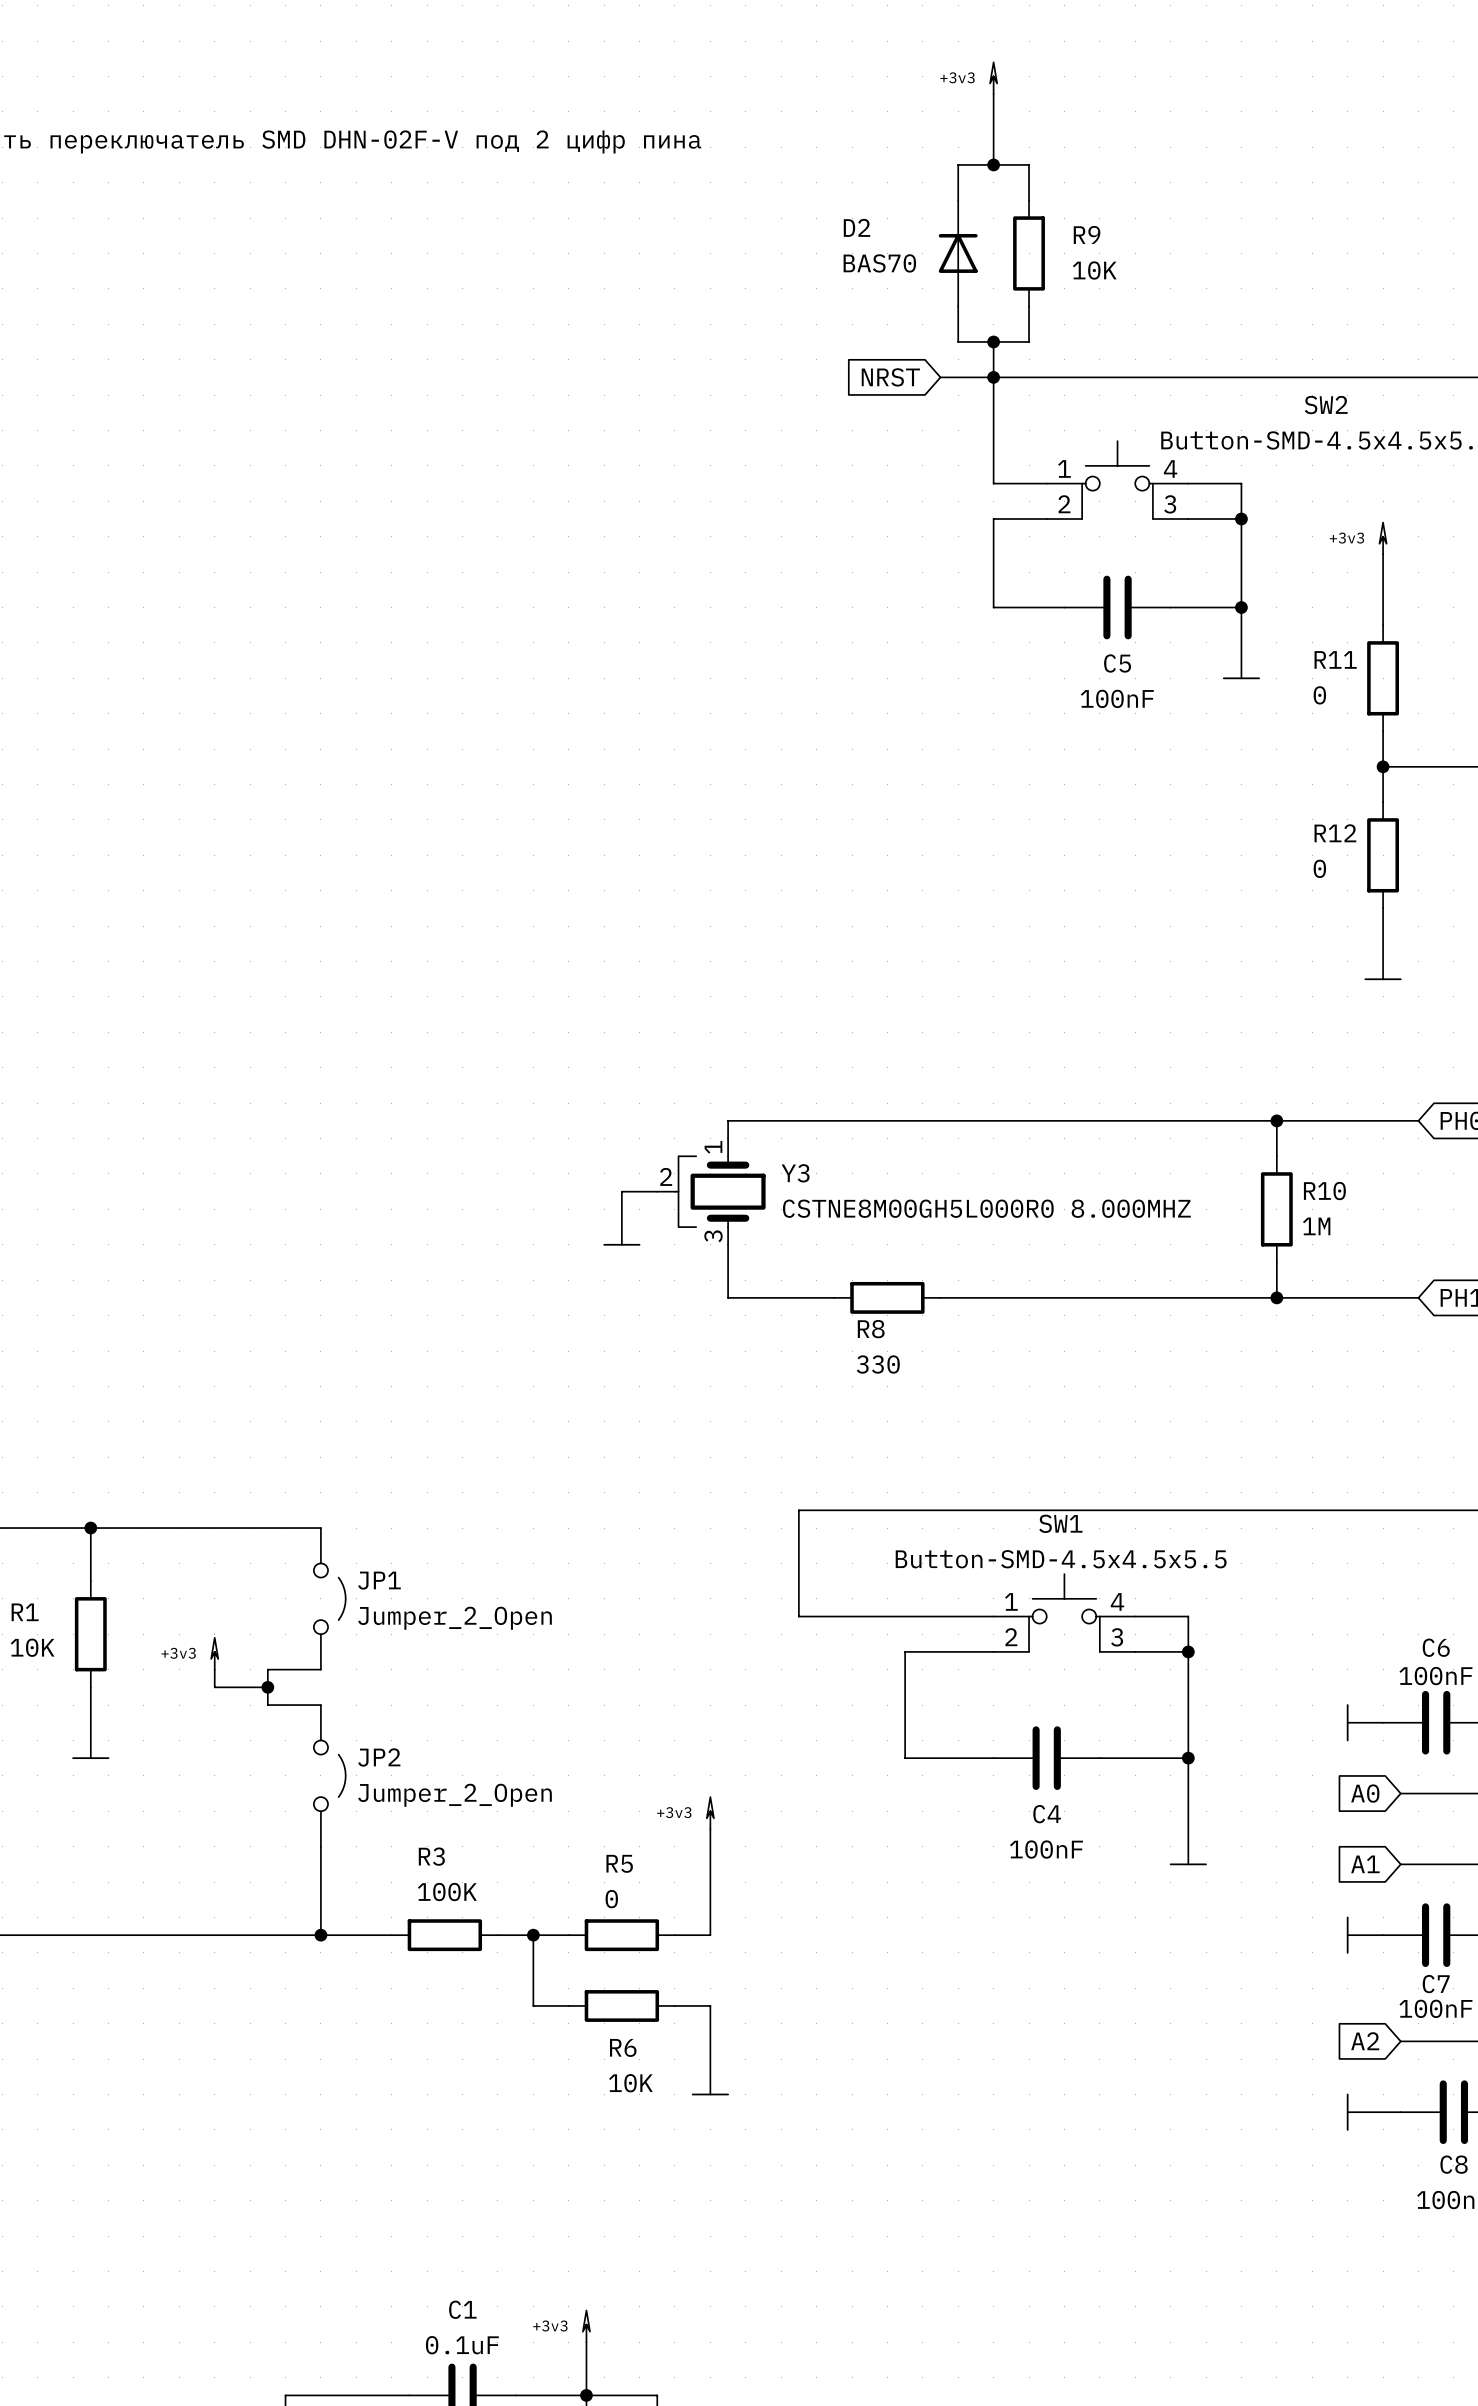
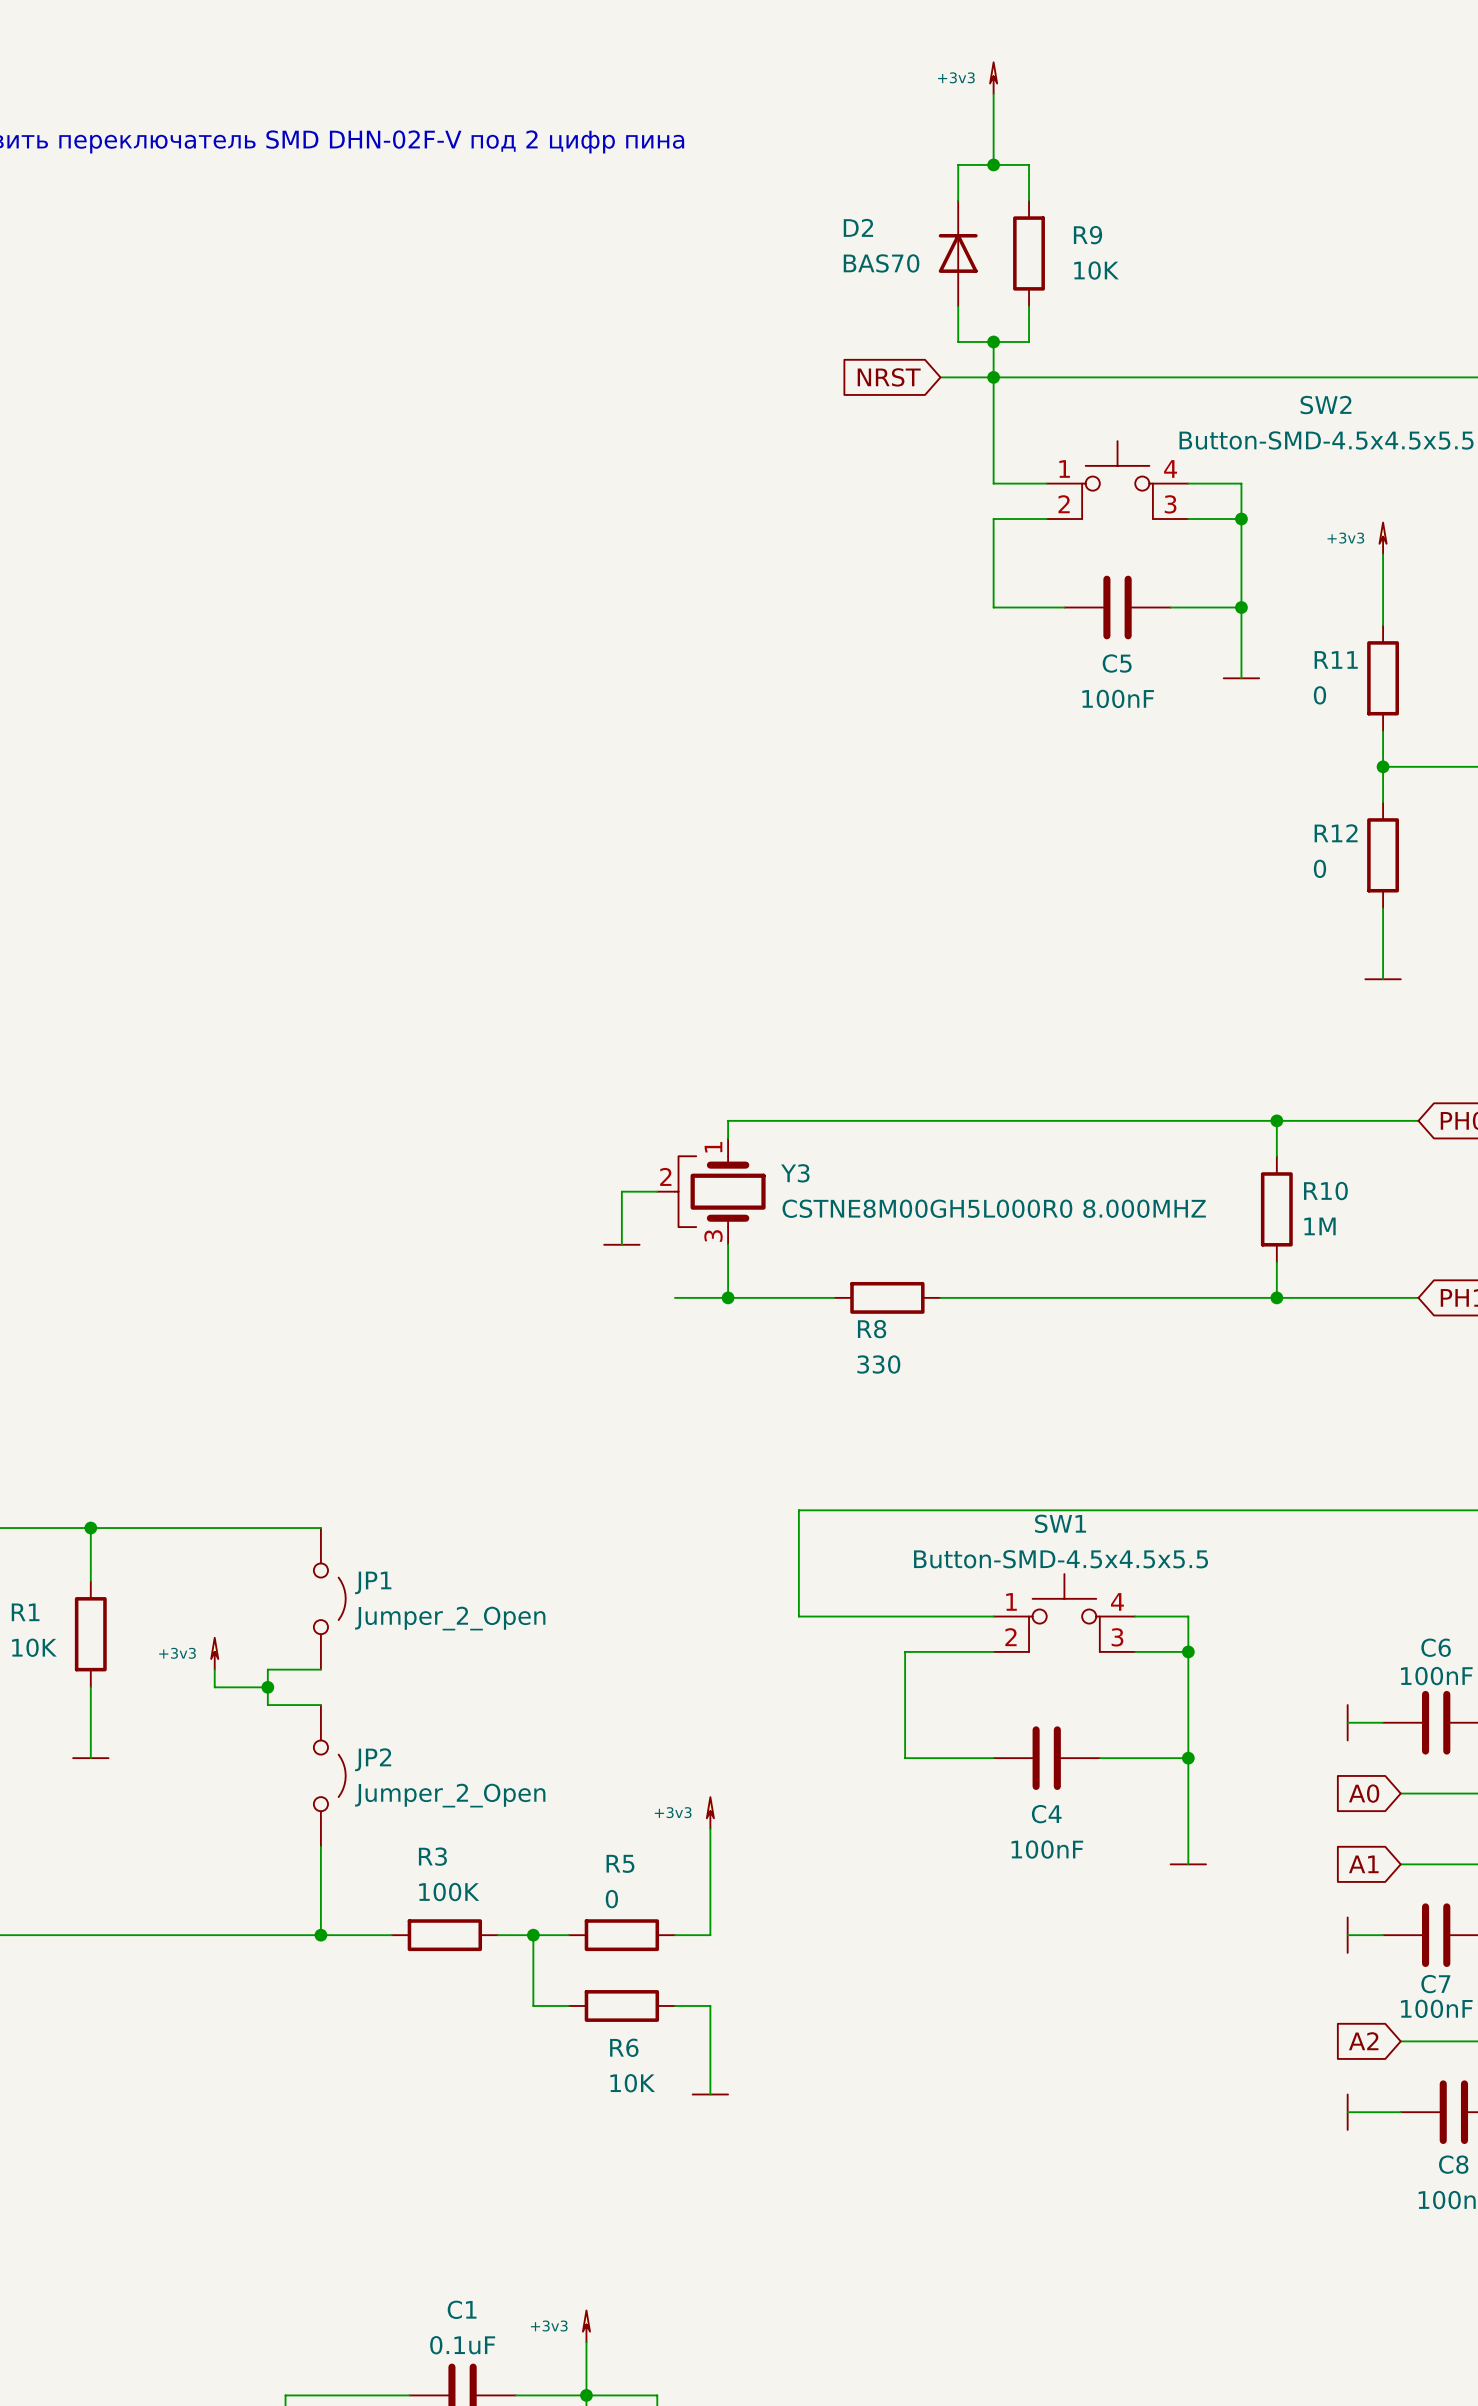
wire: none -> (674, 1297) (728, 1297)
junction: none -> (728, 1297)

